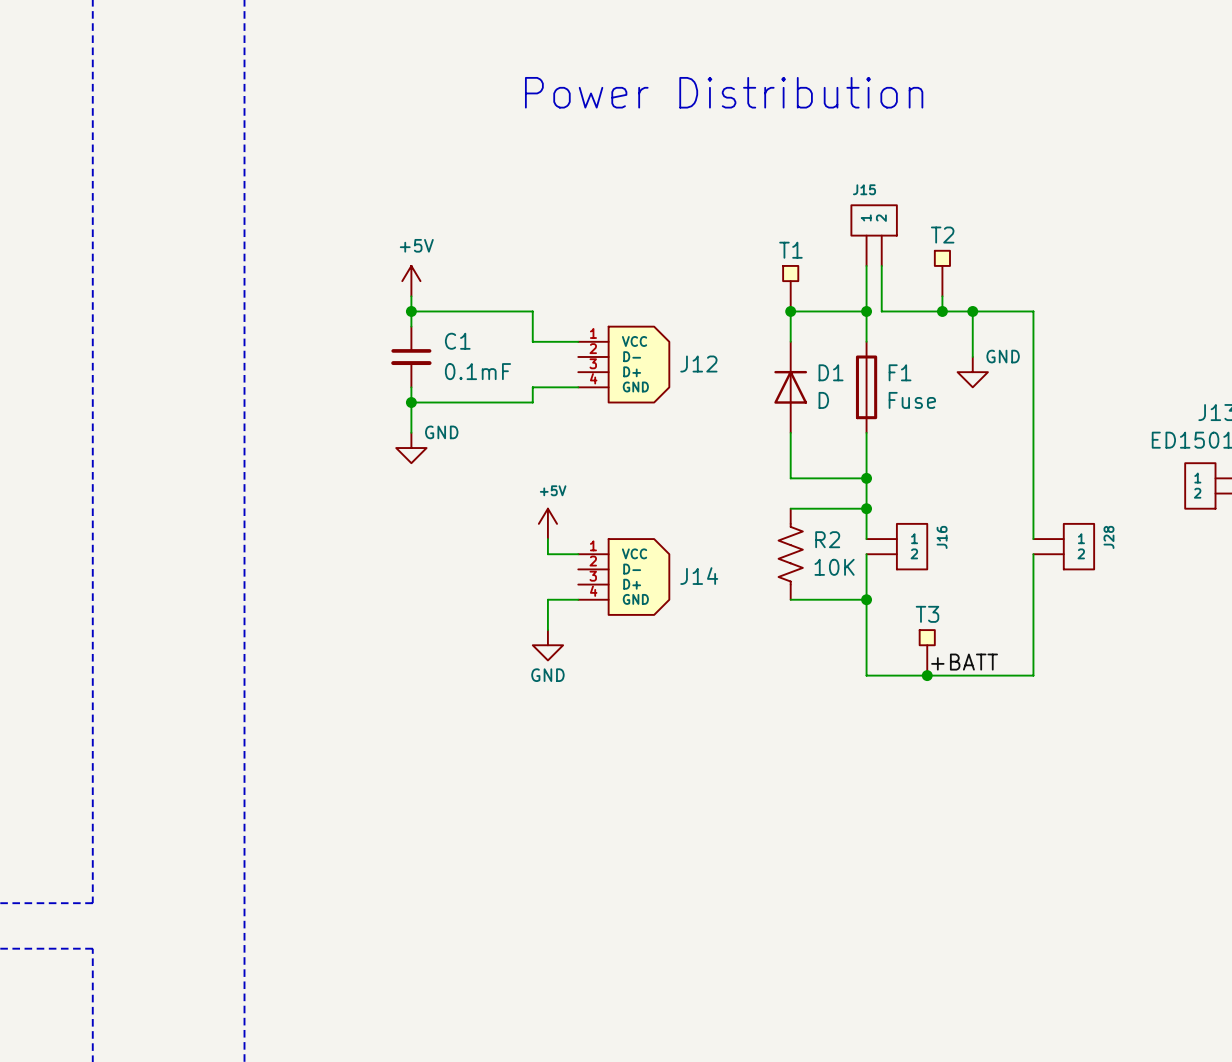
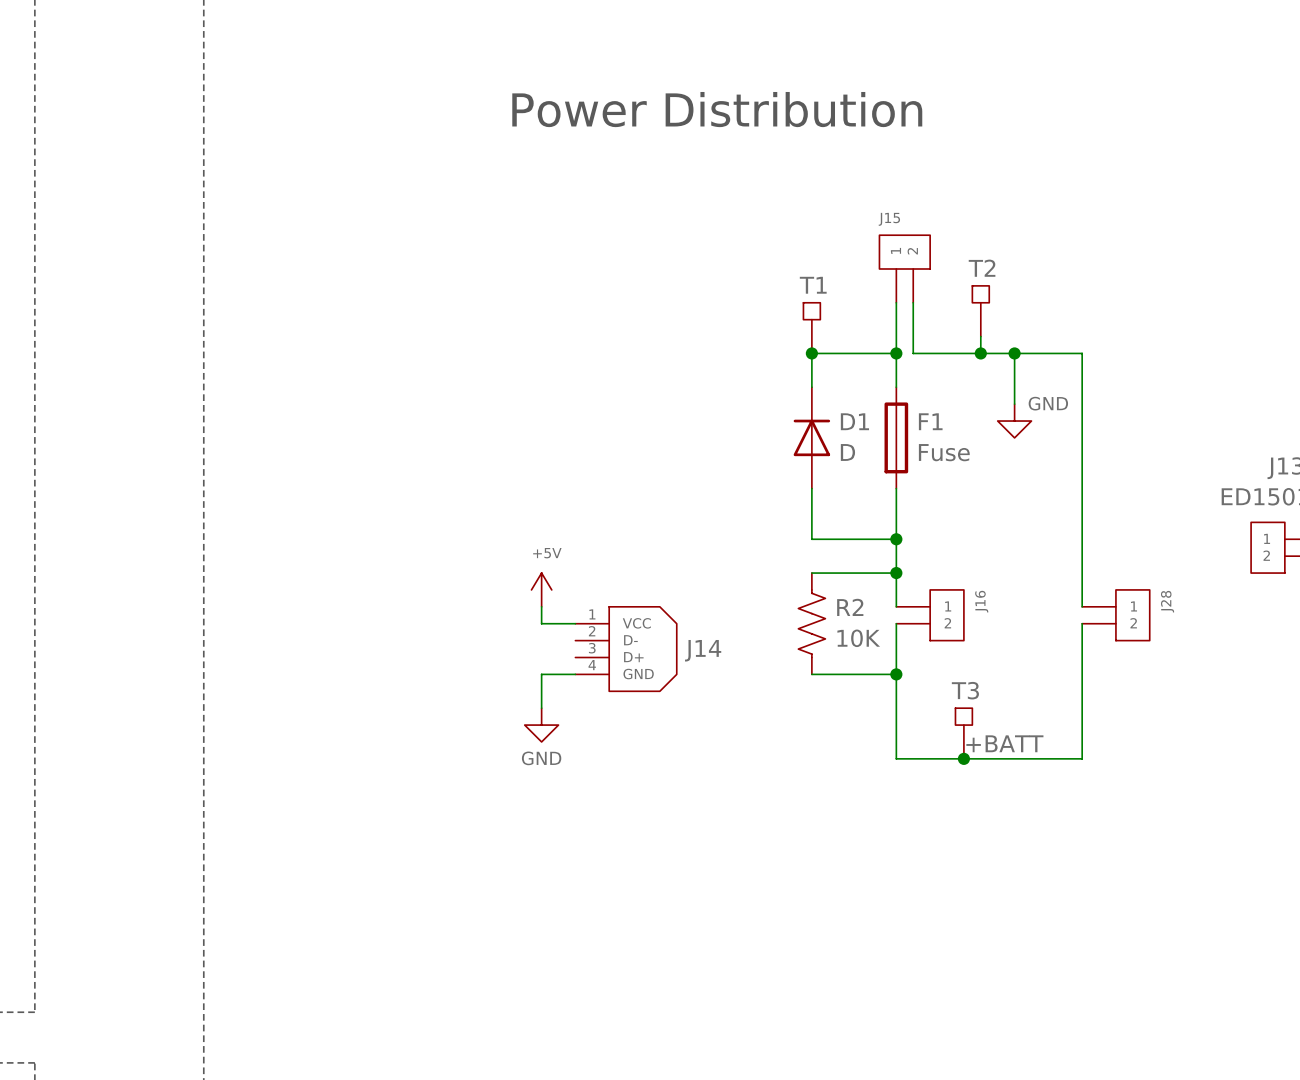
power symbol: +5V (411, 281) -> none
wire: (411, 296) (411, 326) -> none
wire: (411, 311) (532, 311) (532, 341) (578, 341) -> none
junction: (411, 311) -> none
C1: 0.1mF (411, 356) -> none
J12: (623, 364) -> none
wire: (411, 387) (411, 432) -> none
wire: (578, 387) (532, 387) (532, 402) (411, 402) -> none
junction: (411, 402) -> none
power symbol: GND (411, 448) -> none

